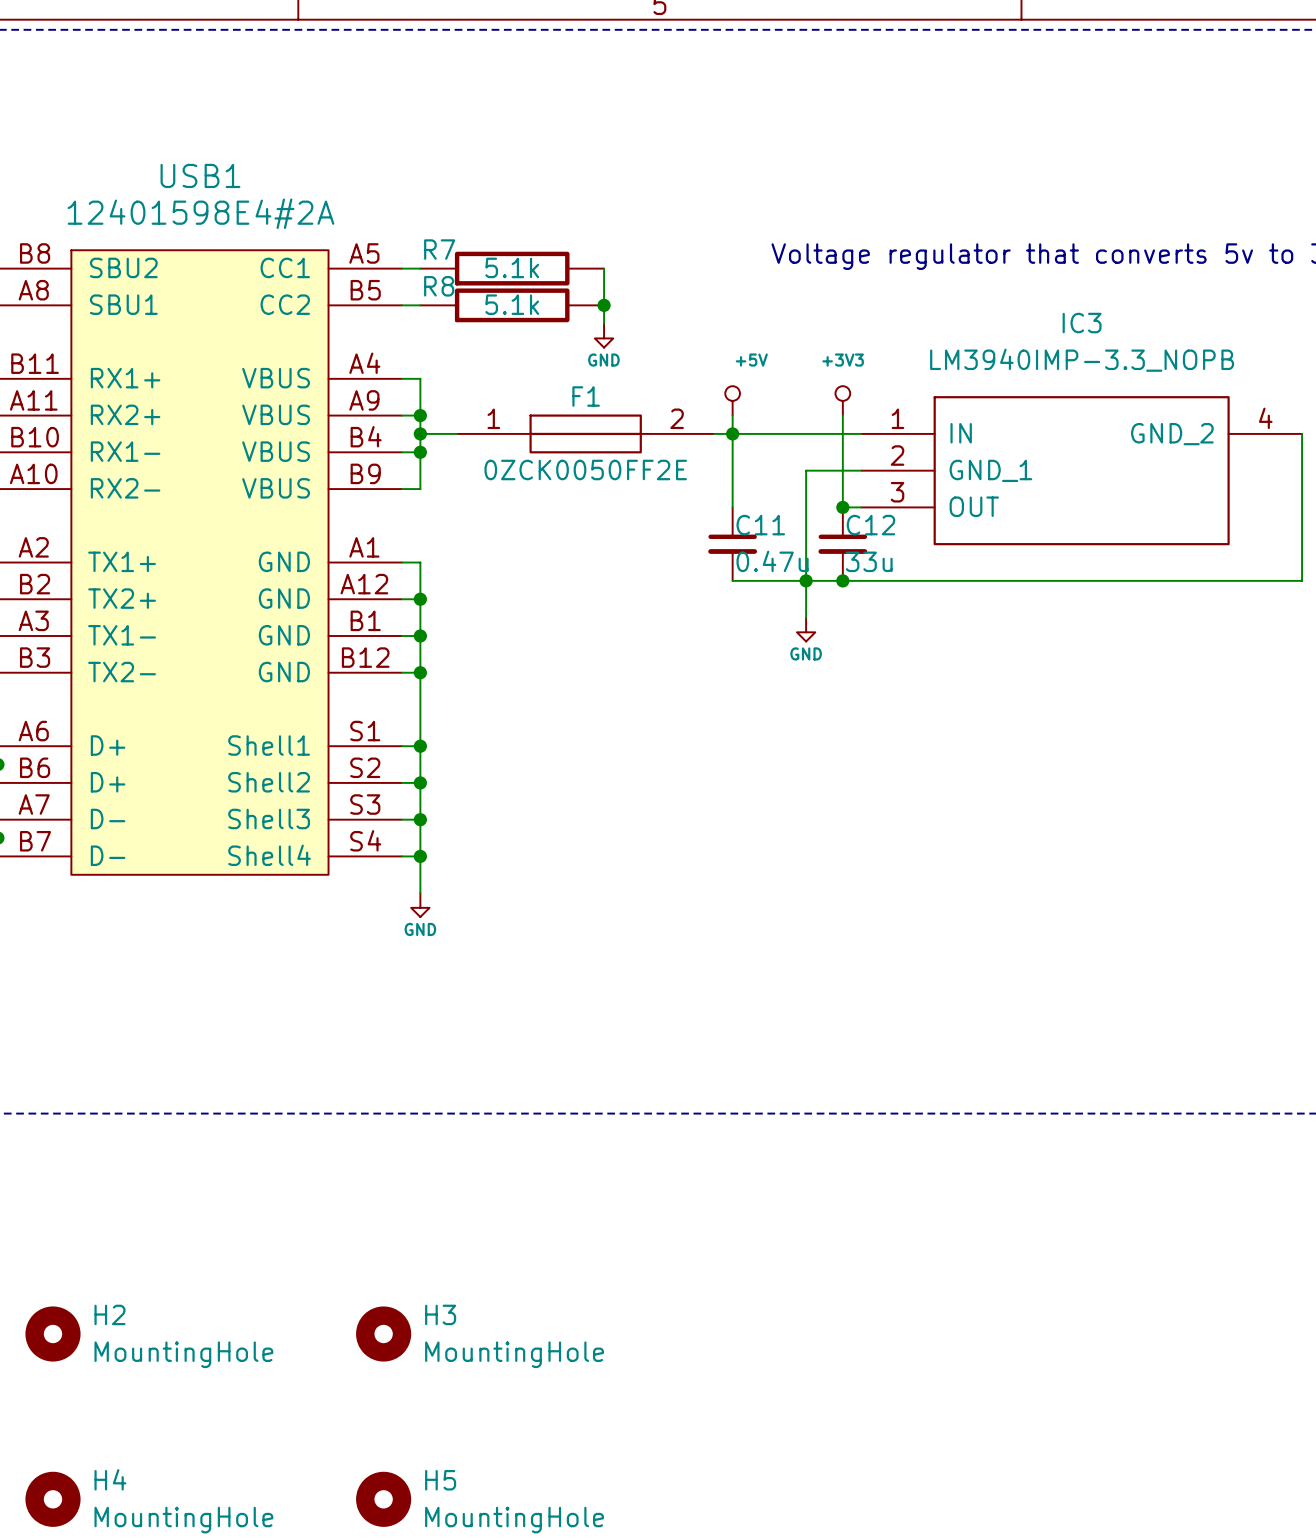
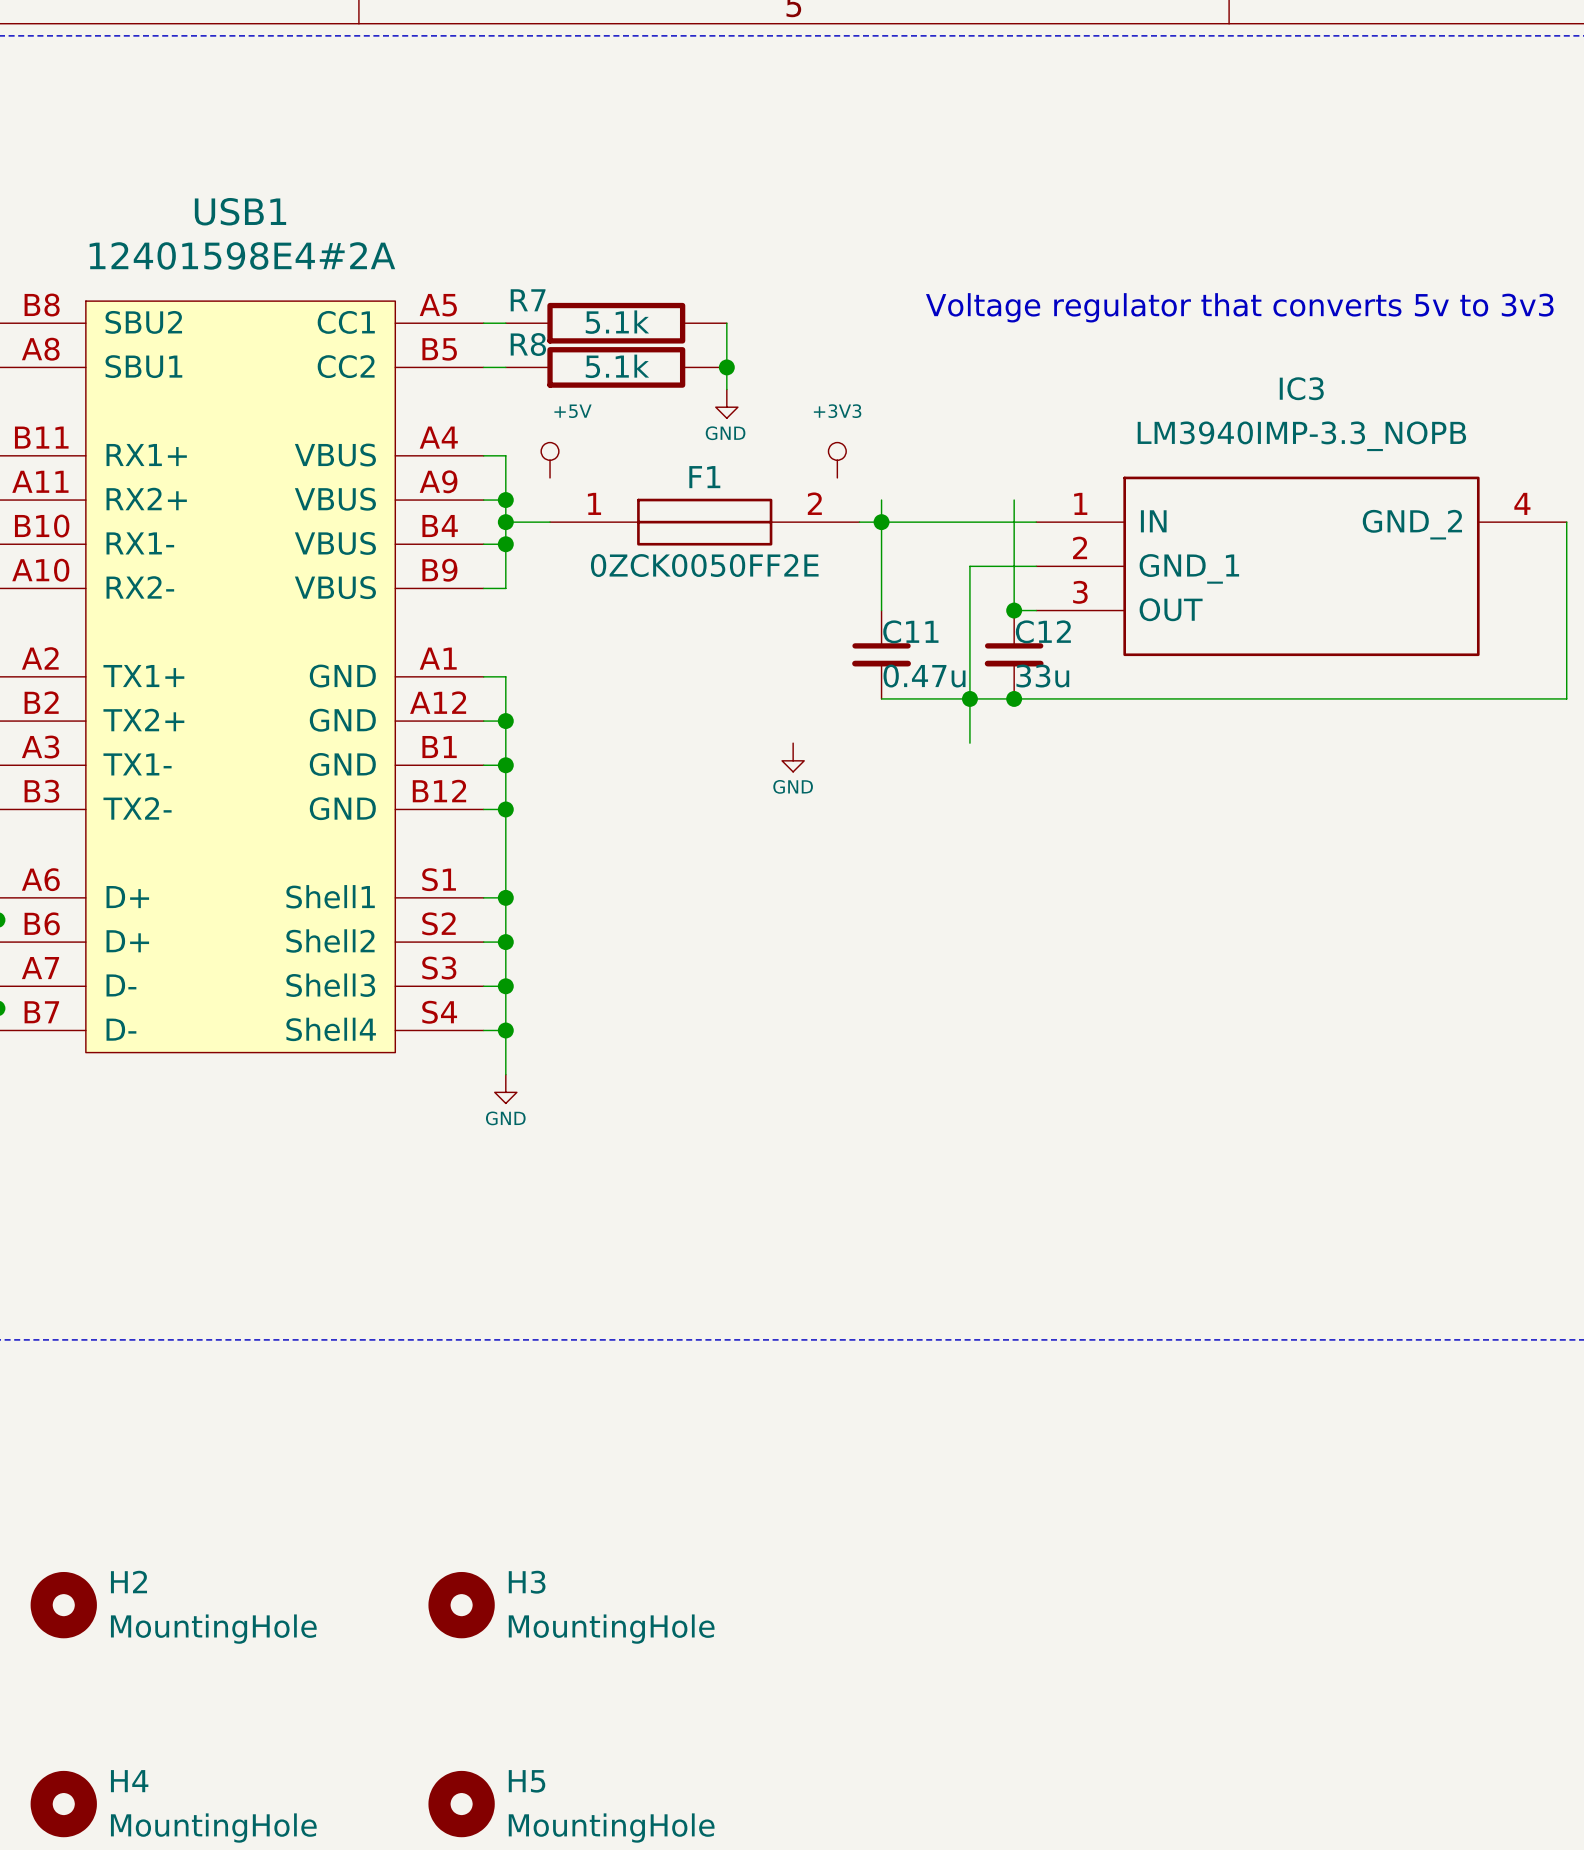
power symbol position: +5V (732, 400) -> +5V (550, 460)
power symbol position: +3V3 (842, 400) -> +3V3 (837, 460)
power symbol position: GND (806, 629) -> GND (793, 757)

